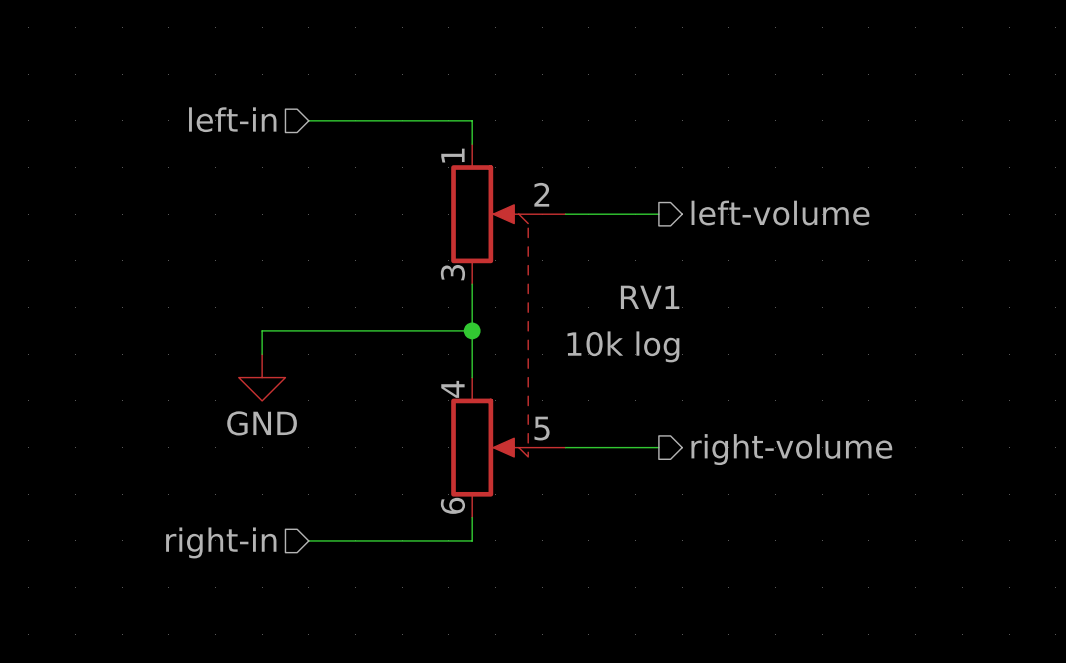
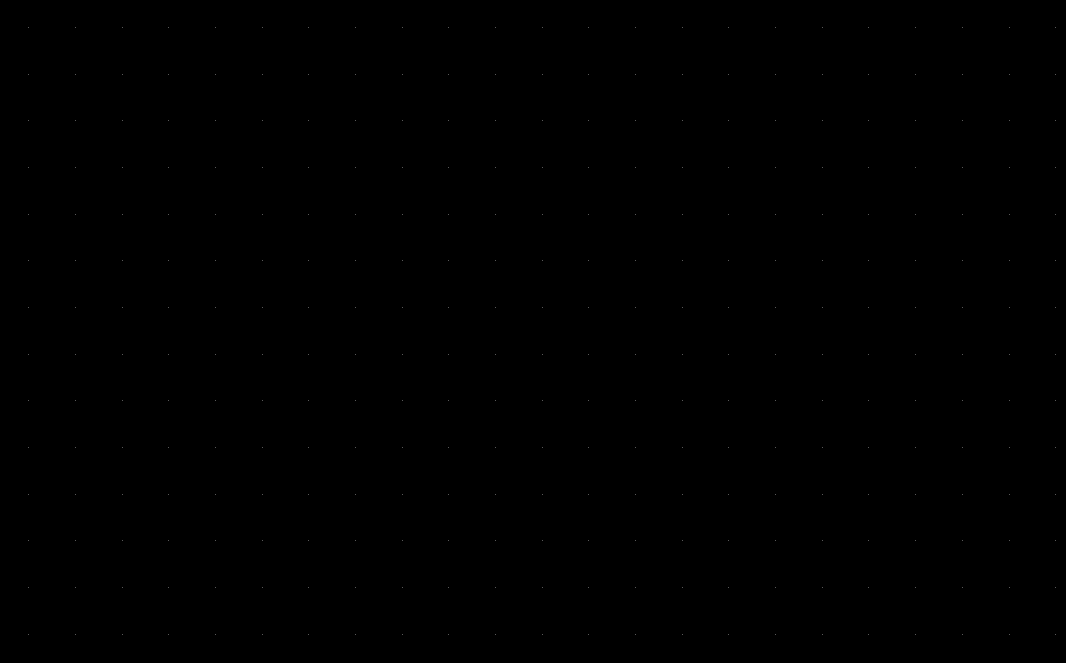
hierarchical label: left-in (232, 119) -> none
wire: (308, 120) (472, 120) (472, 144) -> none
hierarchical label: left-volume (780, 213) -> none
wire: (565, 214) (658, 214) -> none
wire: (472, 284) (472, 377) -> none
wire: (472, 330) (262, 330) (262, 354) -> none
junction: (472, 330) -> none
RV1: 10k log (508, 330) -> none
power symbol: GND (262, 377) -> none
wire: (565, 447) (658, 447) -> none
hierarchical label: right-volume (791, 449) -> none
wire: (472, 517) (472, 540) (308, 540) -> none
hierarchical label: right-in (221, 542) -> none

